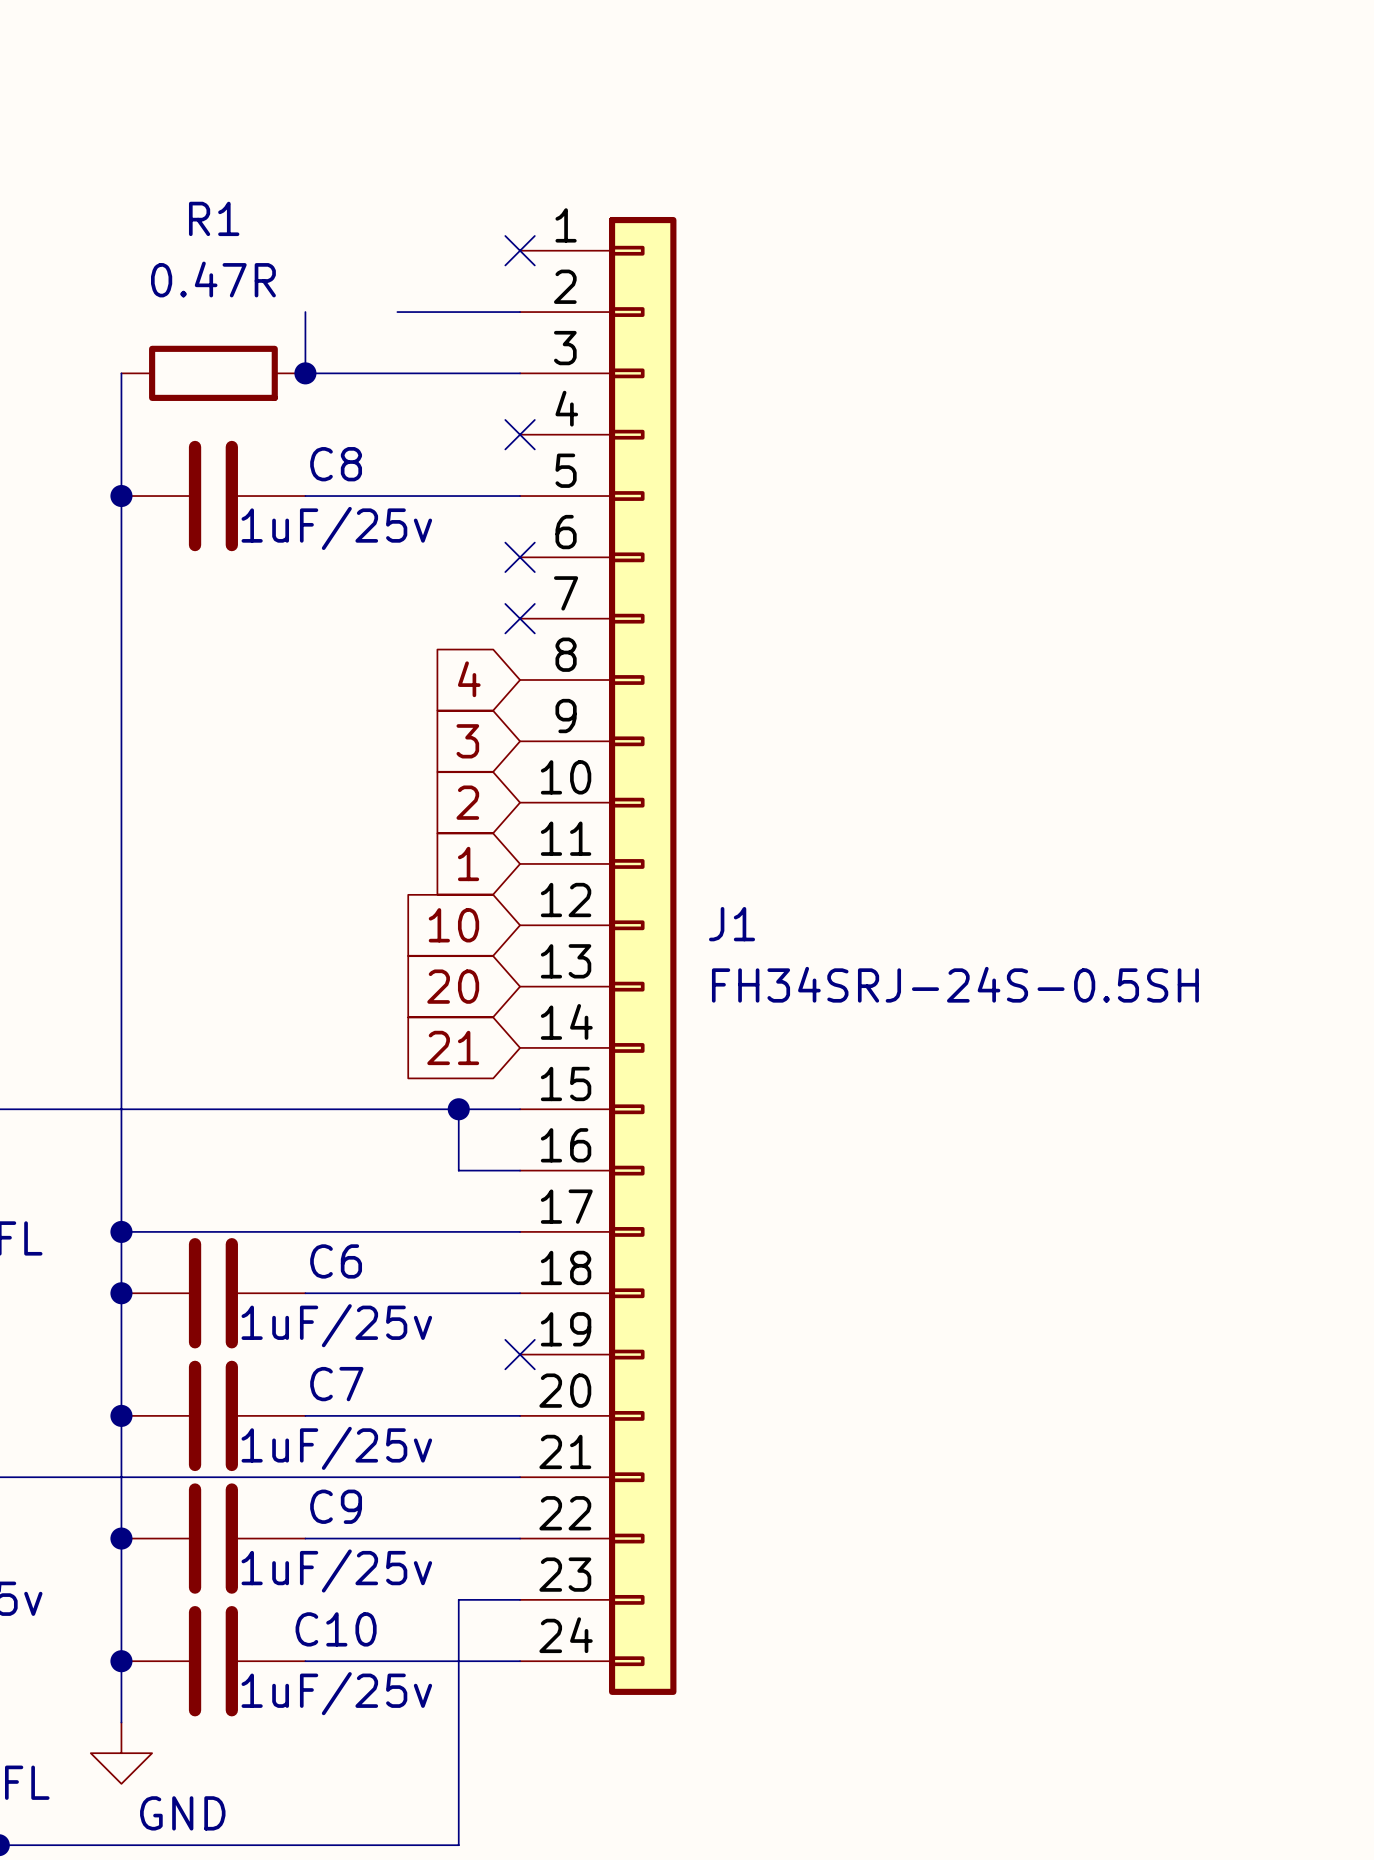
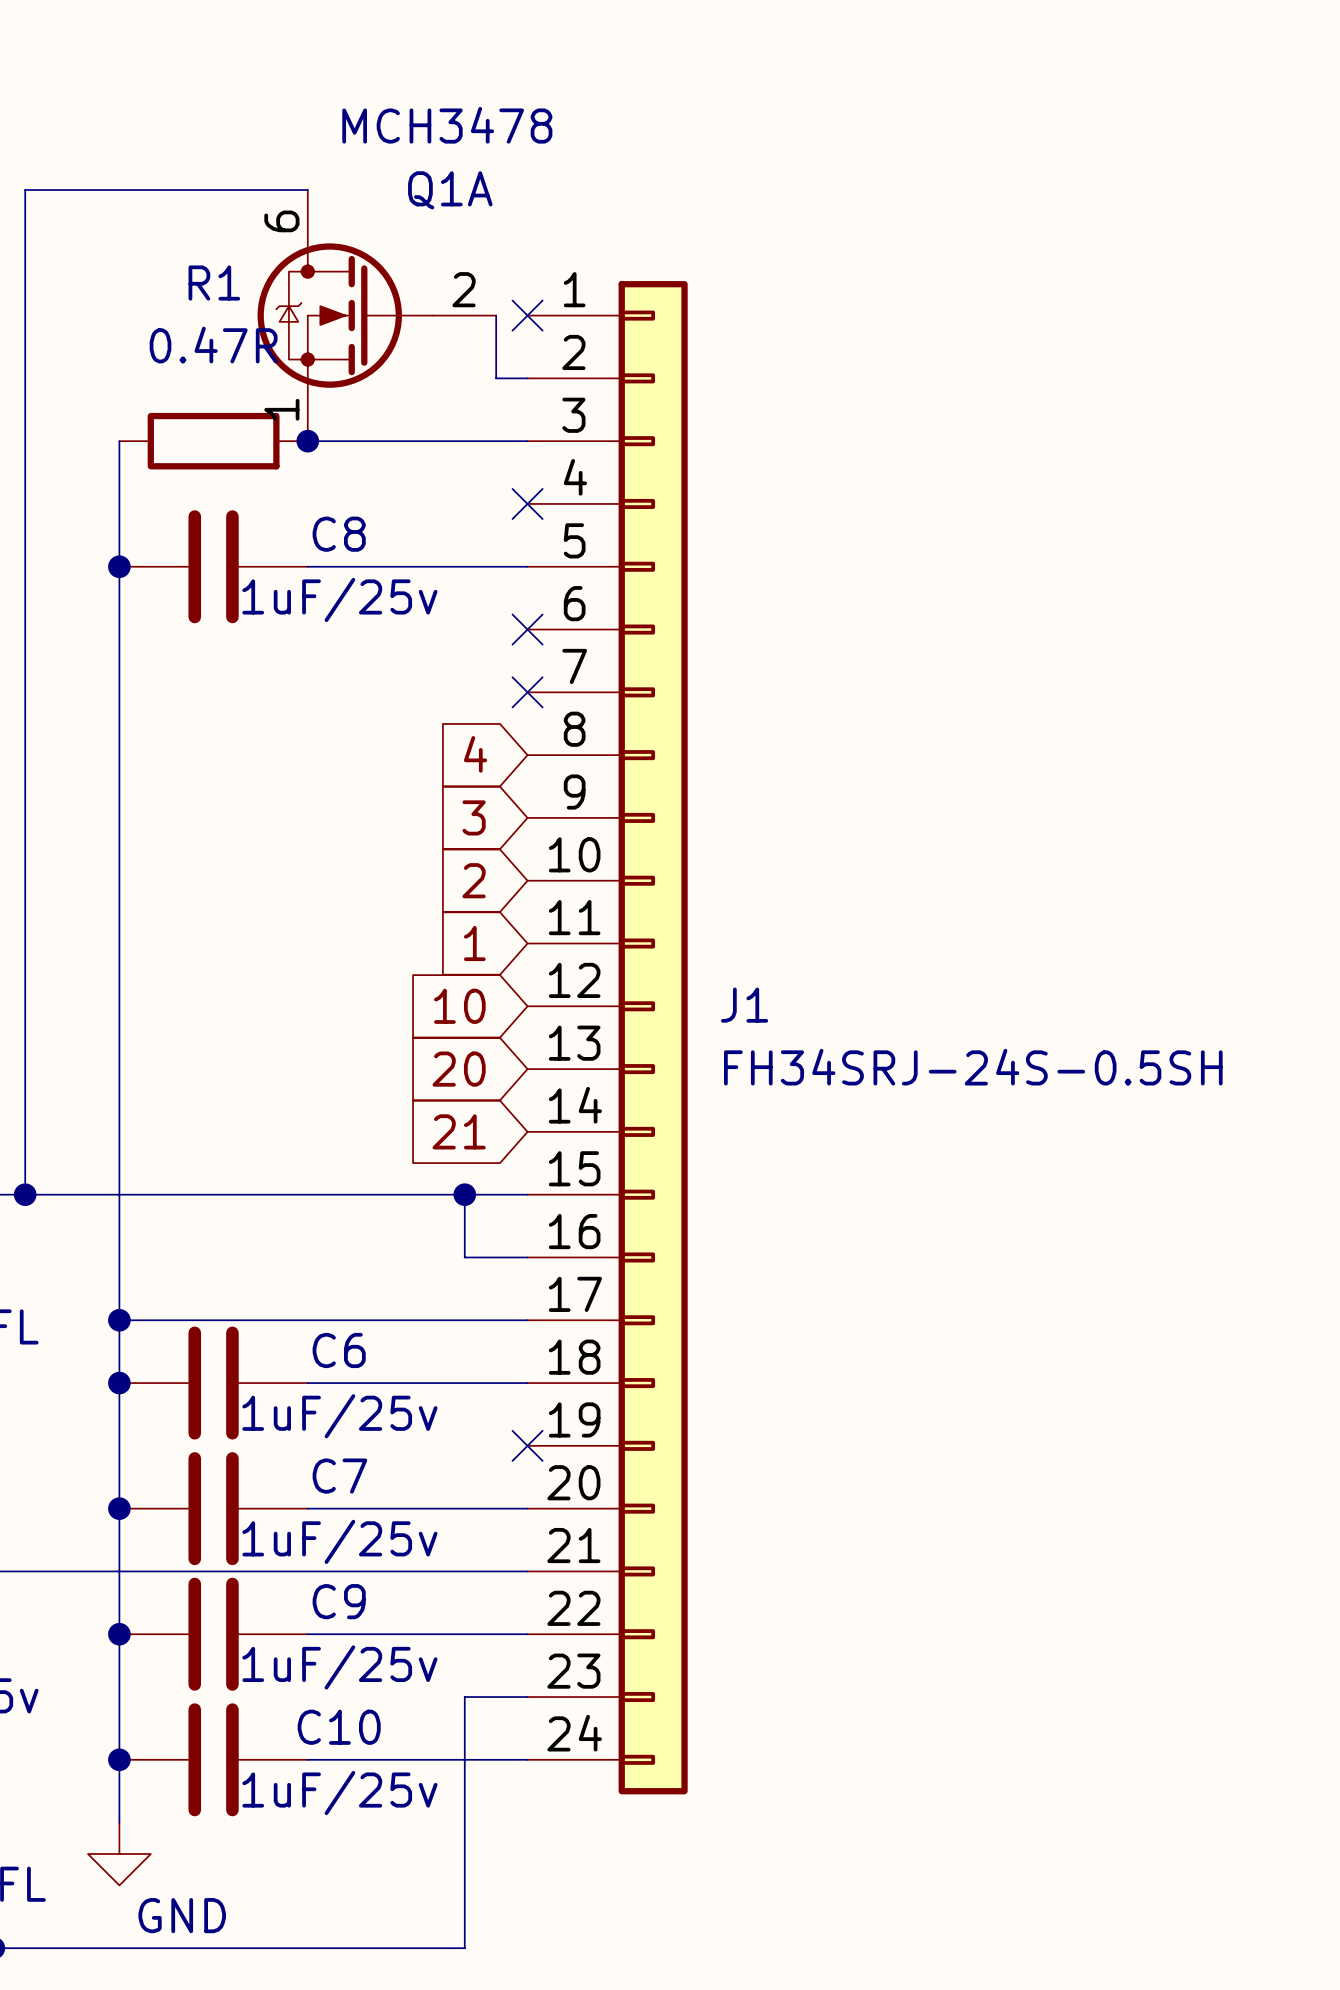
wire: none -> (307, 190) (25, 190) (25, 1194)
Q1A: none -> MCH3478 (376, 315)
wire: (397, 312) (489, 312) -> (496, 315) (496, 378)
junction: none -> (25, 1194)

